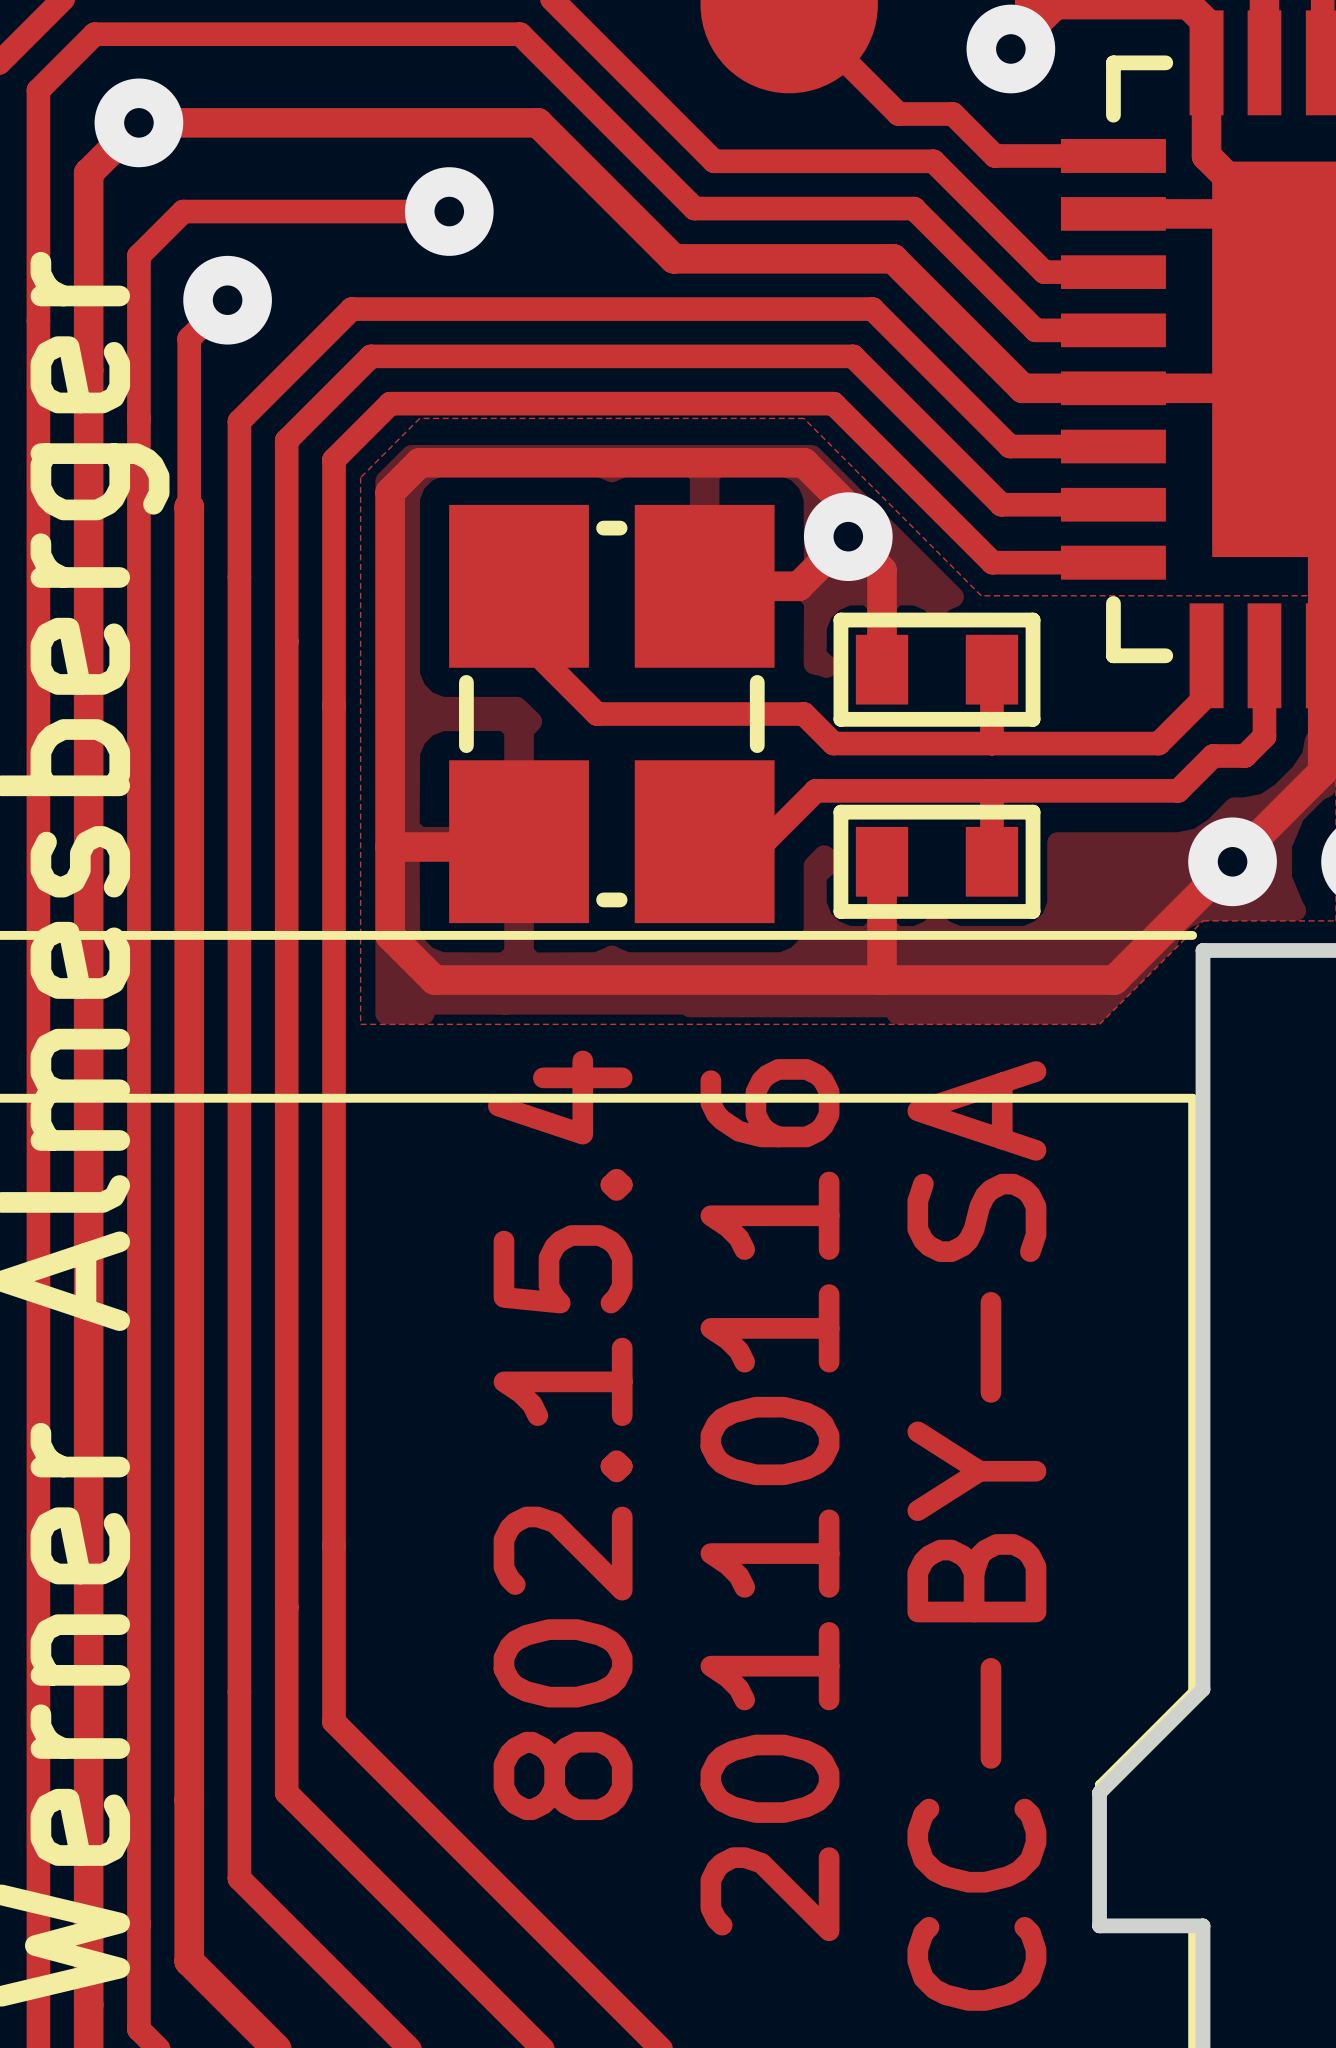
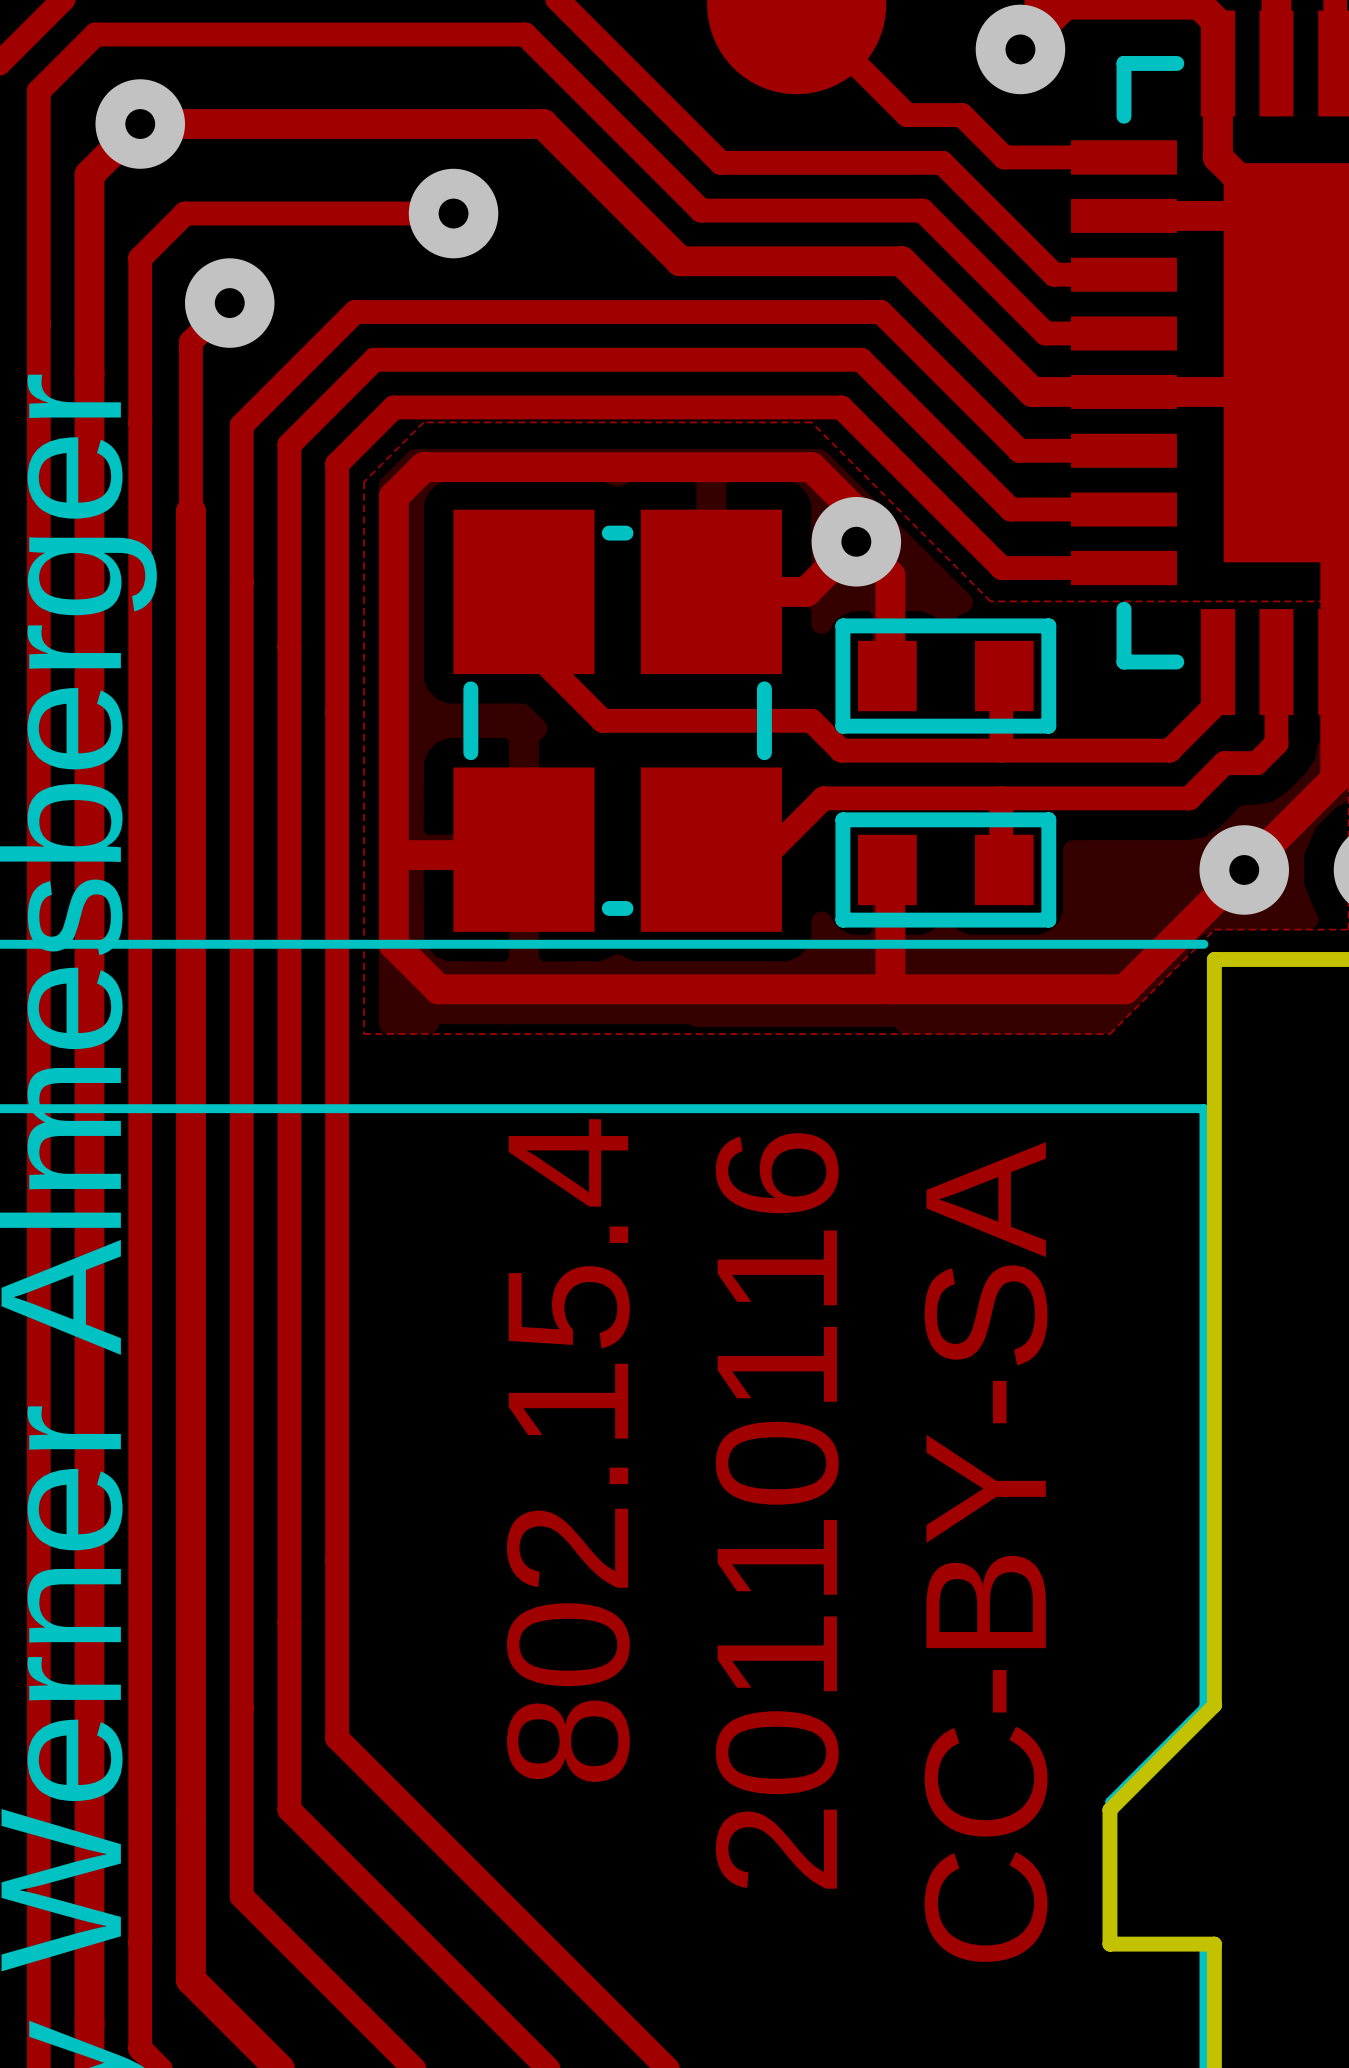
part footprint: [833, 612, 1041, 727] -> [835, 618, 1057, 734]
part footprint: [833, 804, 1041, 919] -> [835, 812, 1057, 928]

